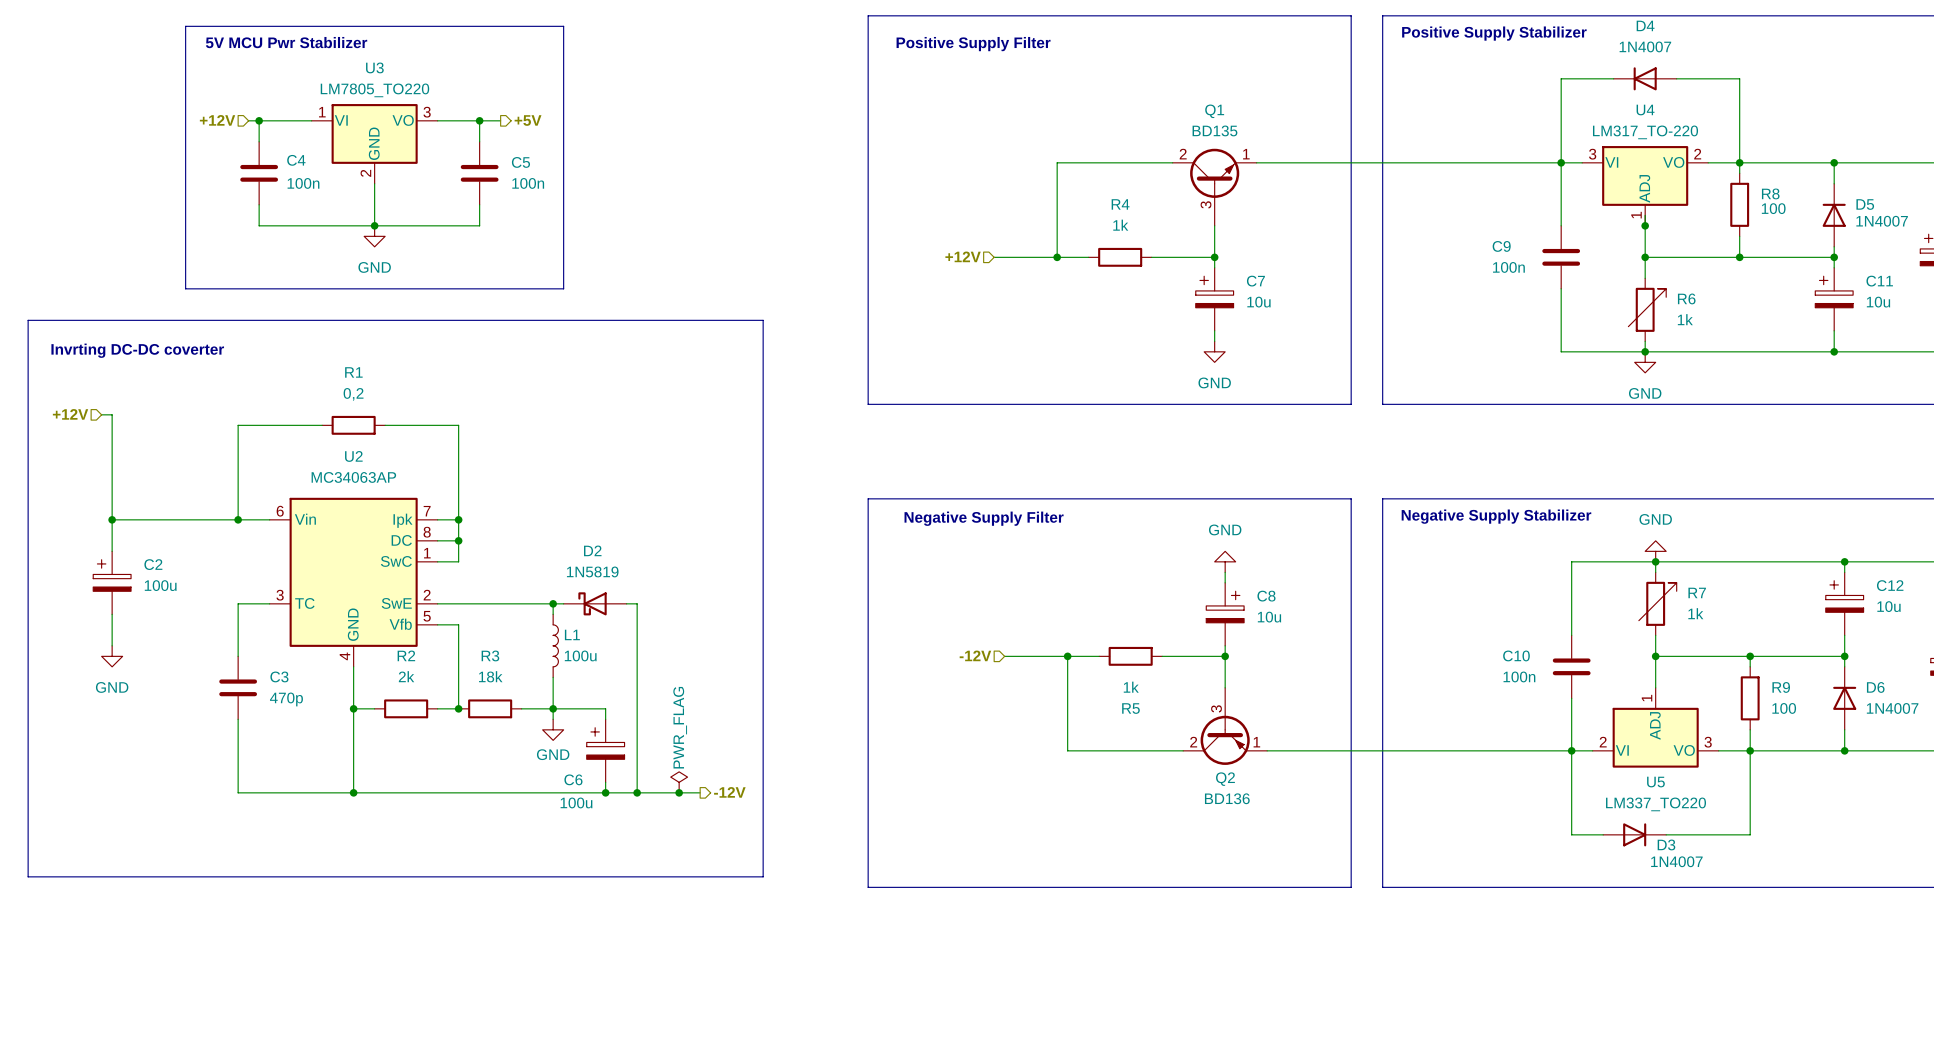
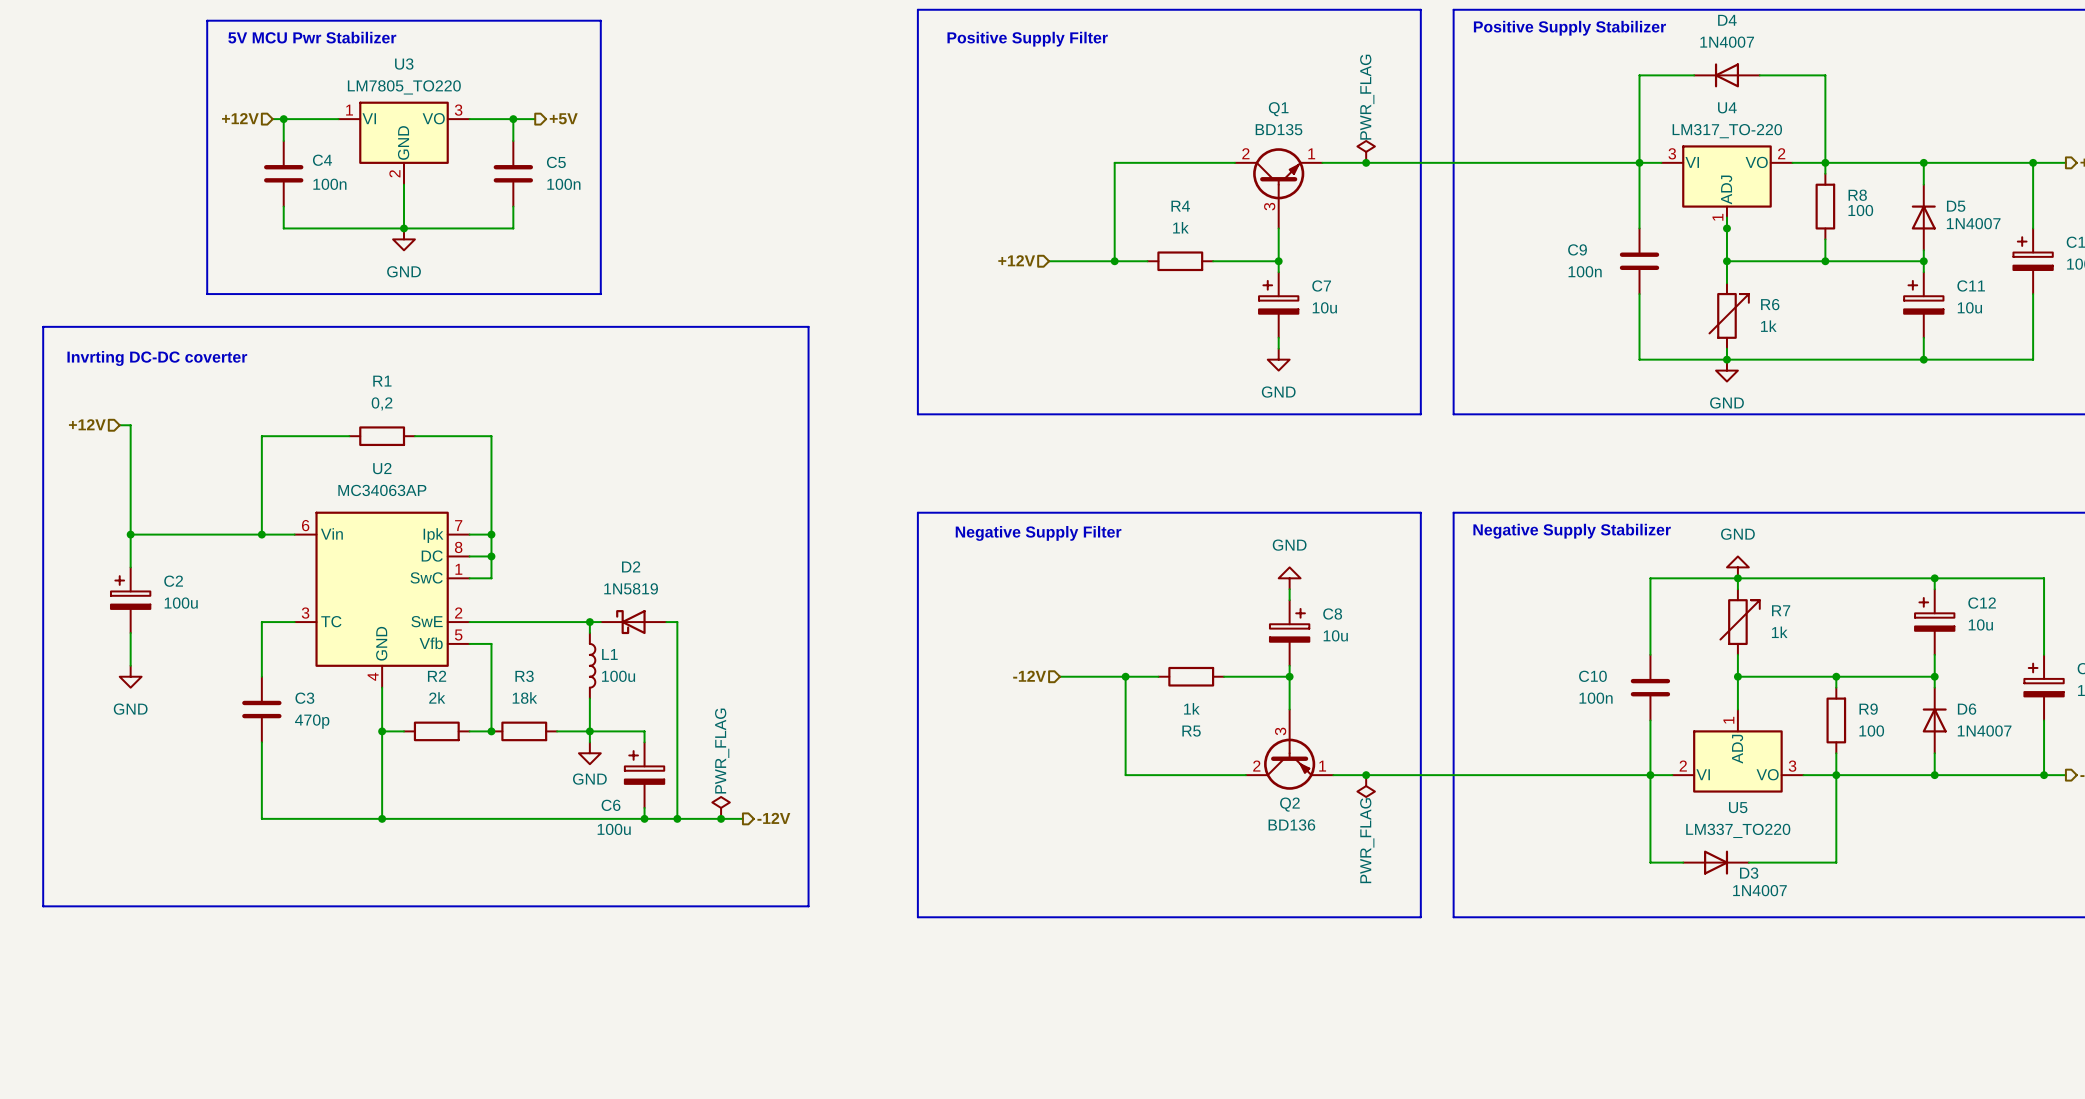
power symbol: none -> PWR_FLAG (1366, 151)
junction: none -> (1366, 162)
junction: none -> (1366, 775)
power symbol: none -> PWR_FLAG (1366, 786)

